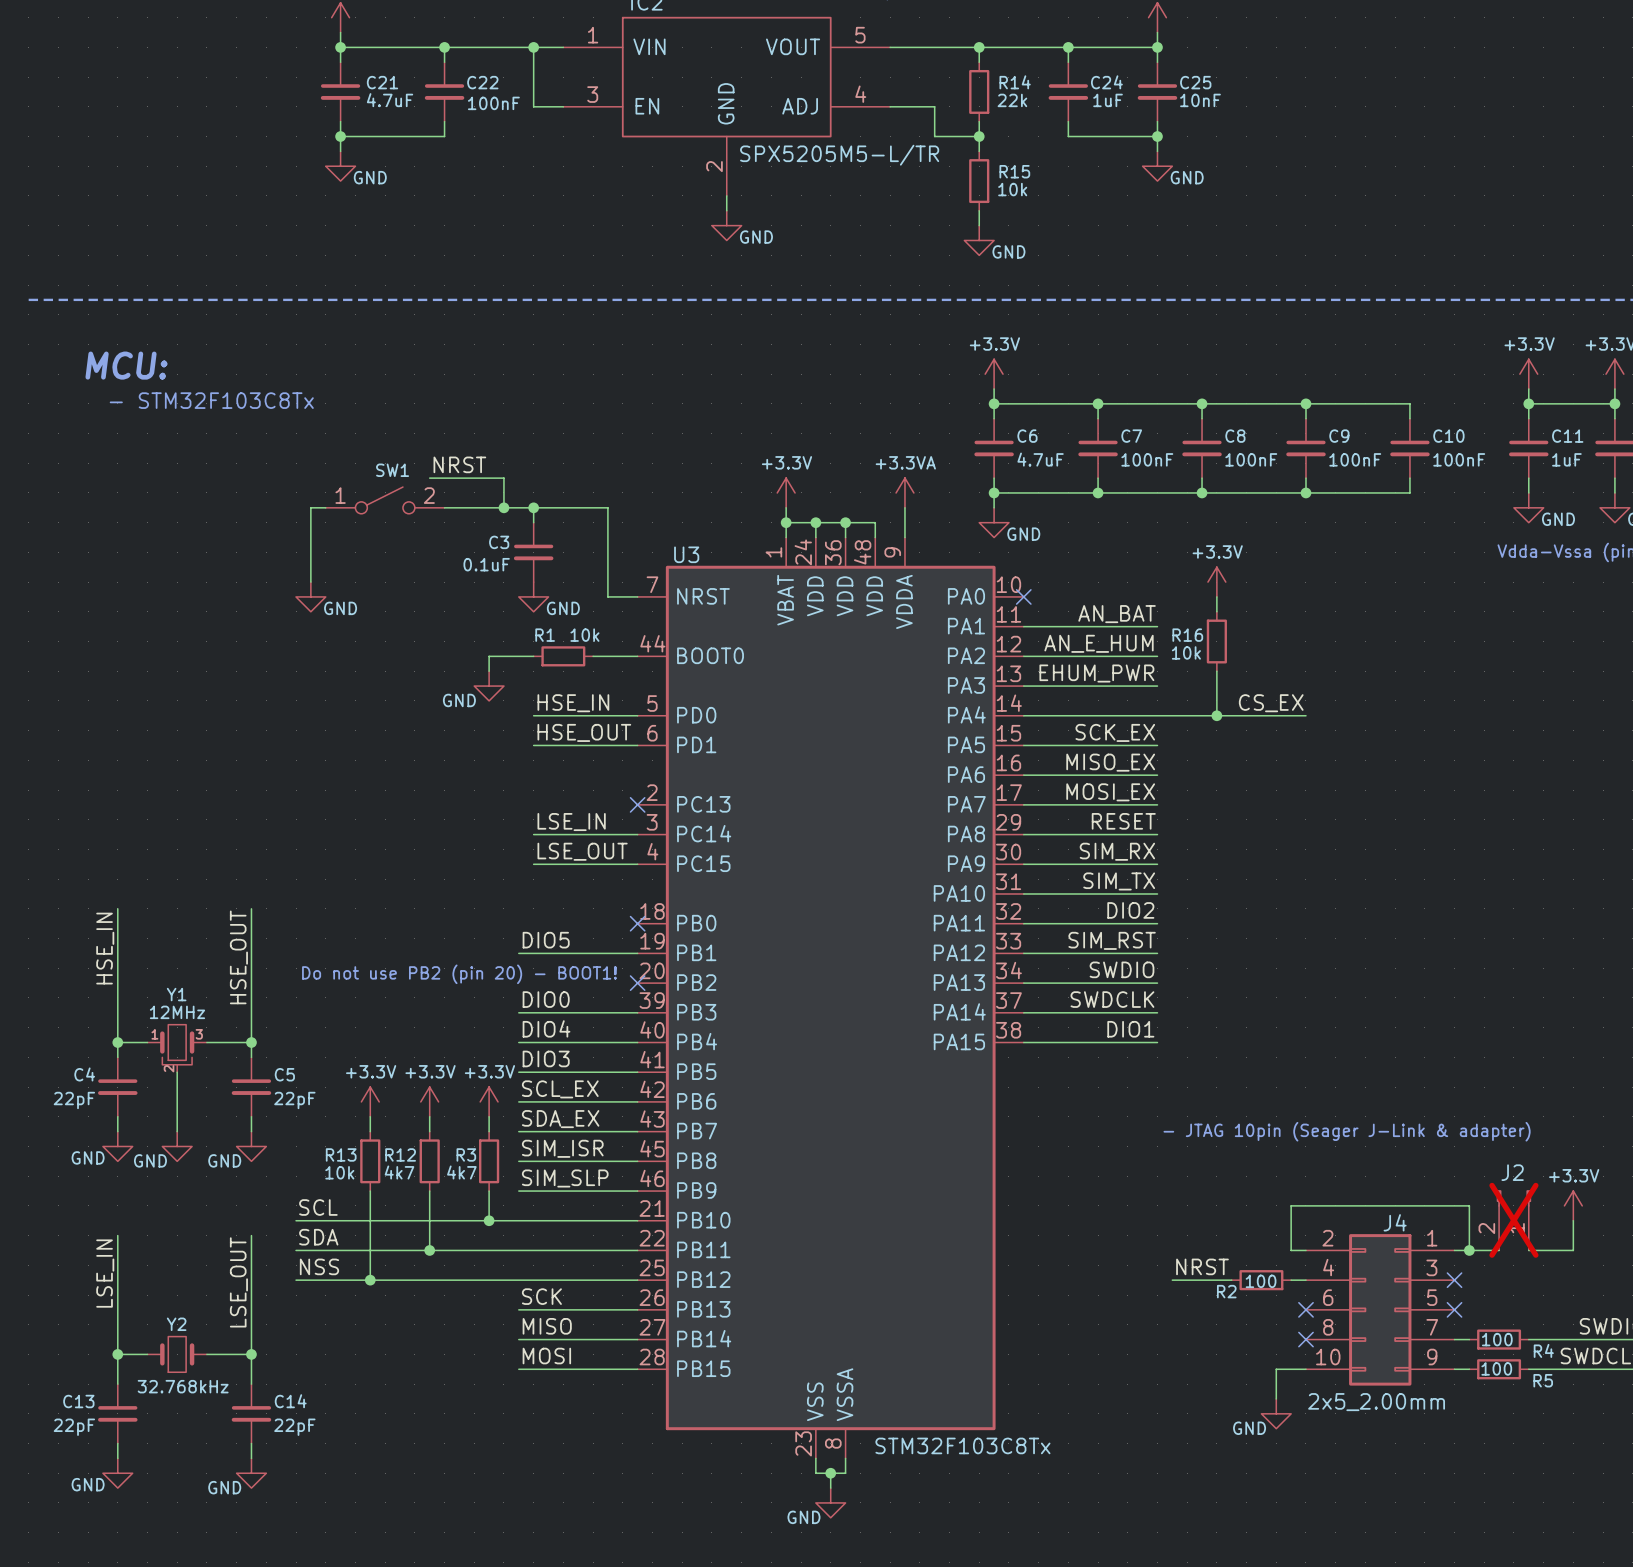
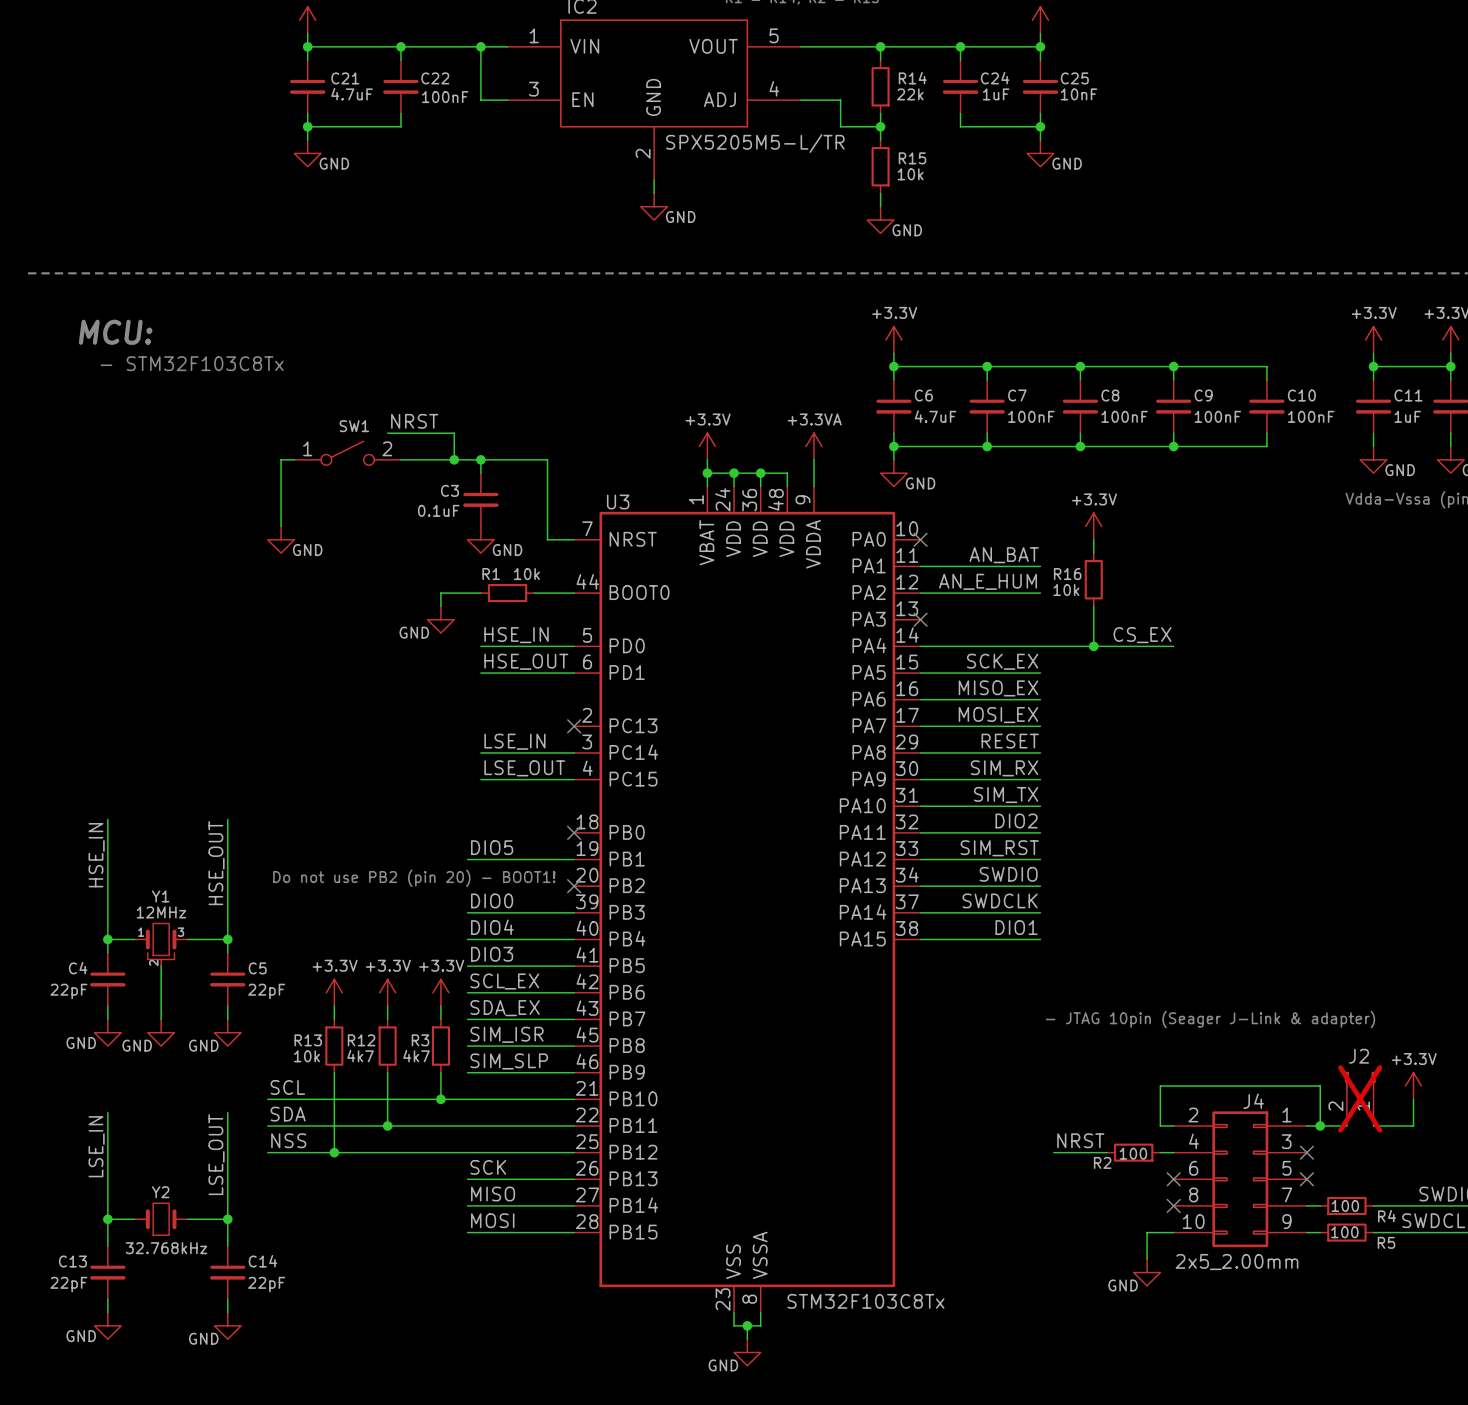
label: EHUM_PWR (1096, 673) -> none
wire: (1023, 686) (1157, 686) -> none
no-connect mark: none -> (920, 619)

